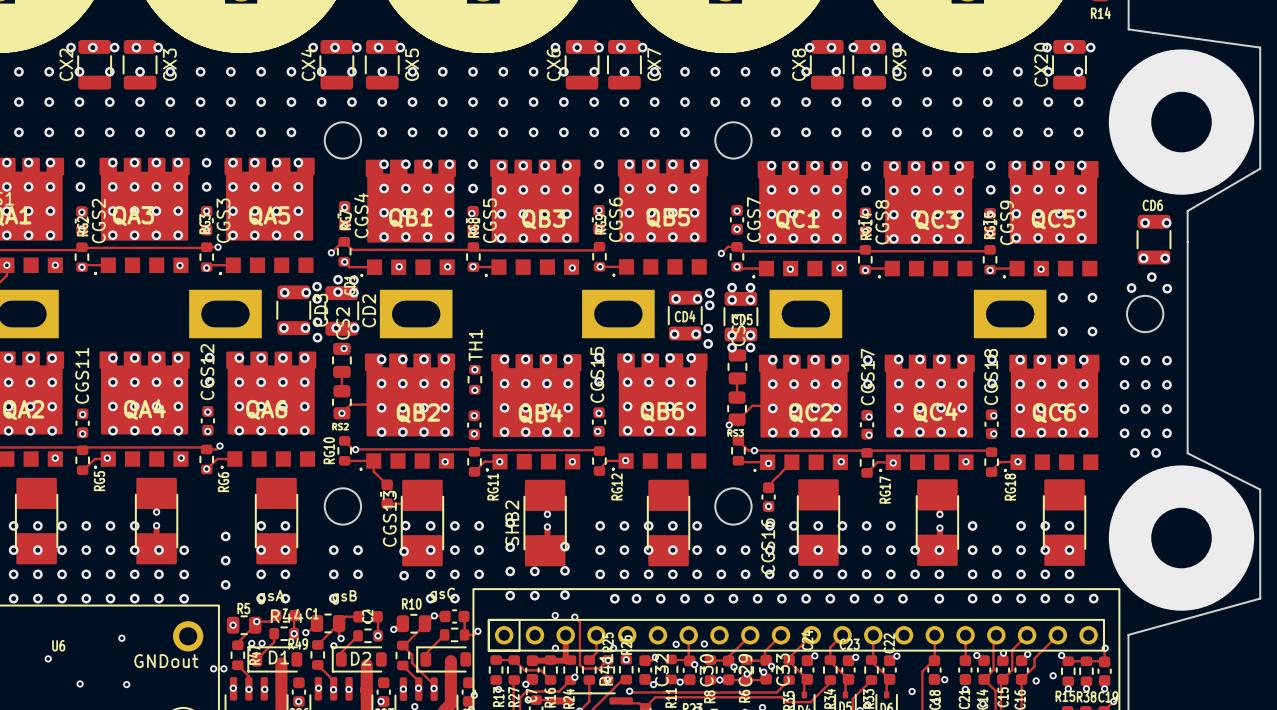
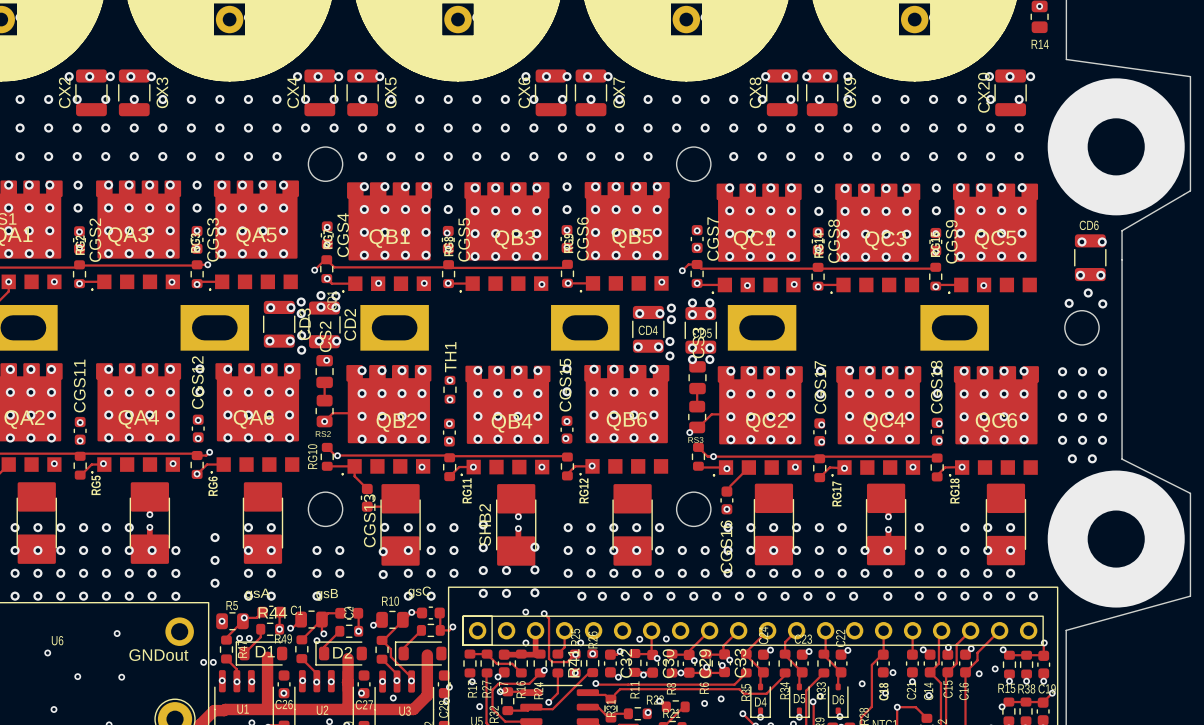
via: none -> (661, 282)
via: (1062, 297) -> none
via: (1092, 297) -> none
via: (1062, 331) -> none
via: (1092, 331) -> none

